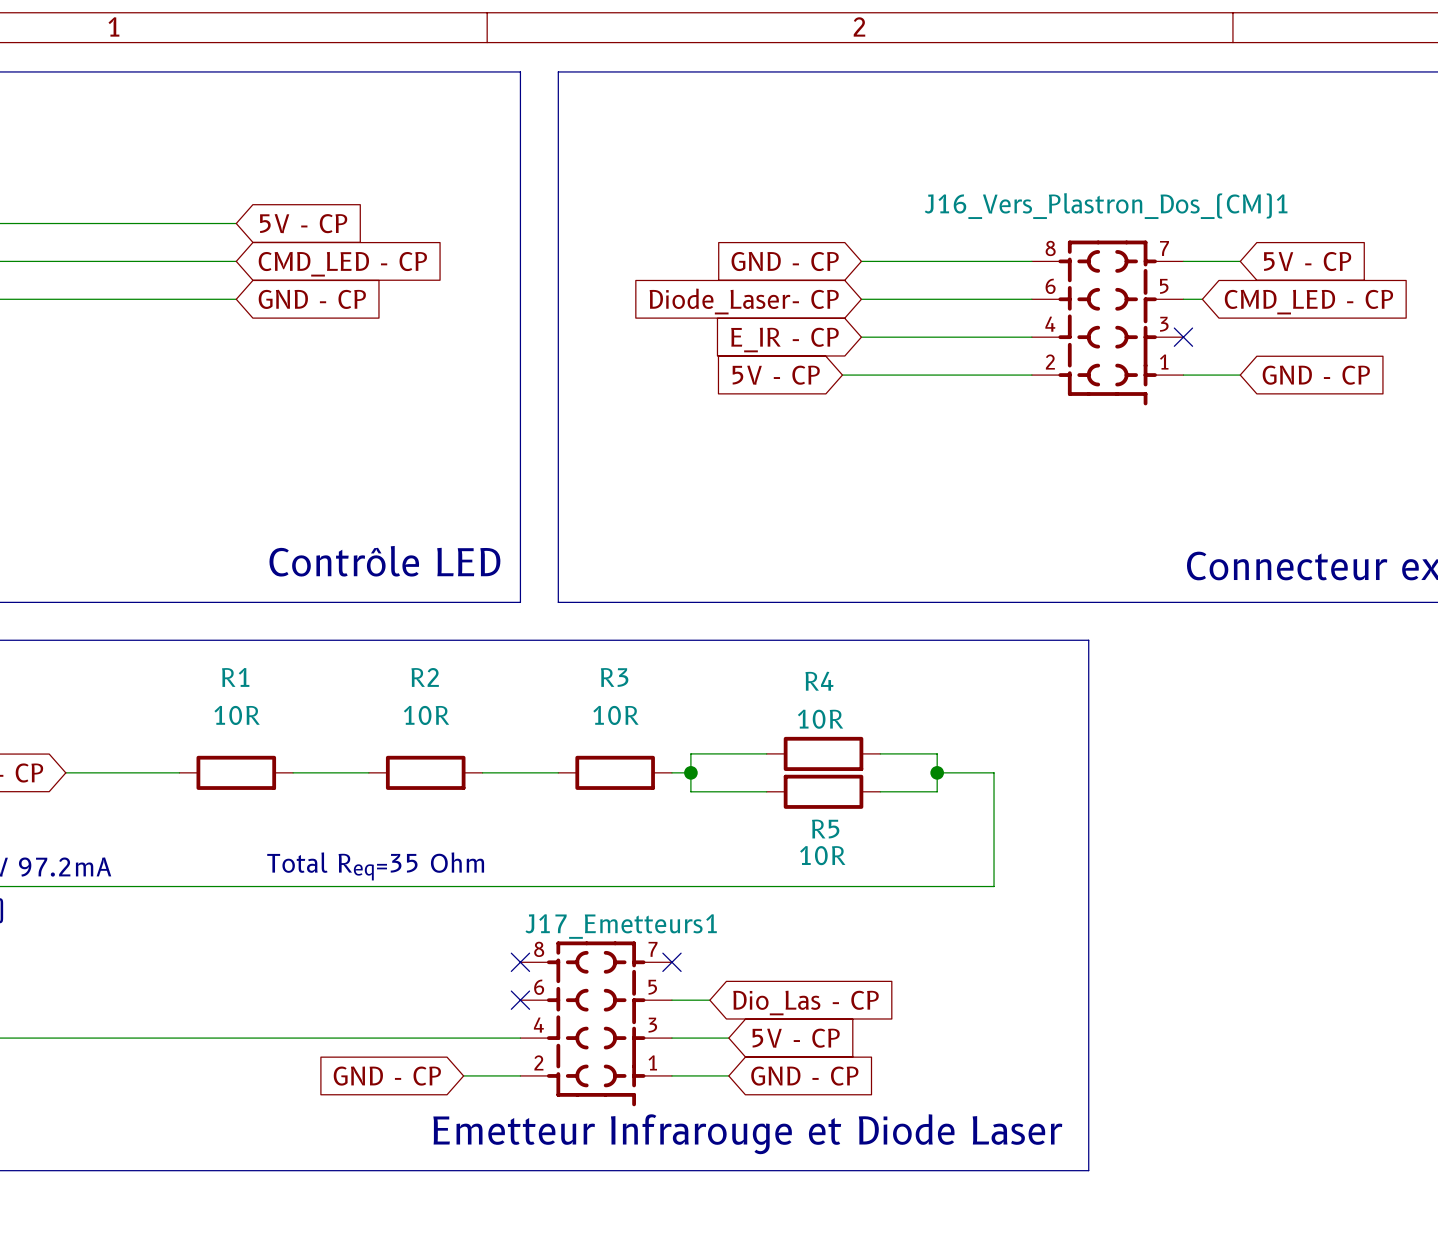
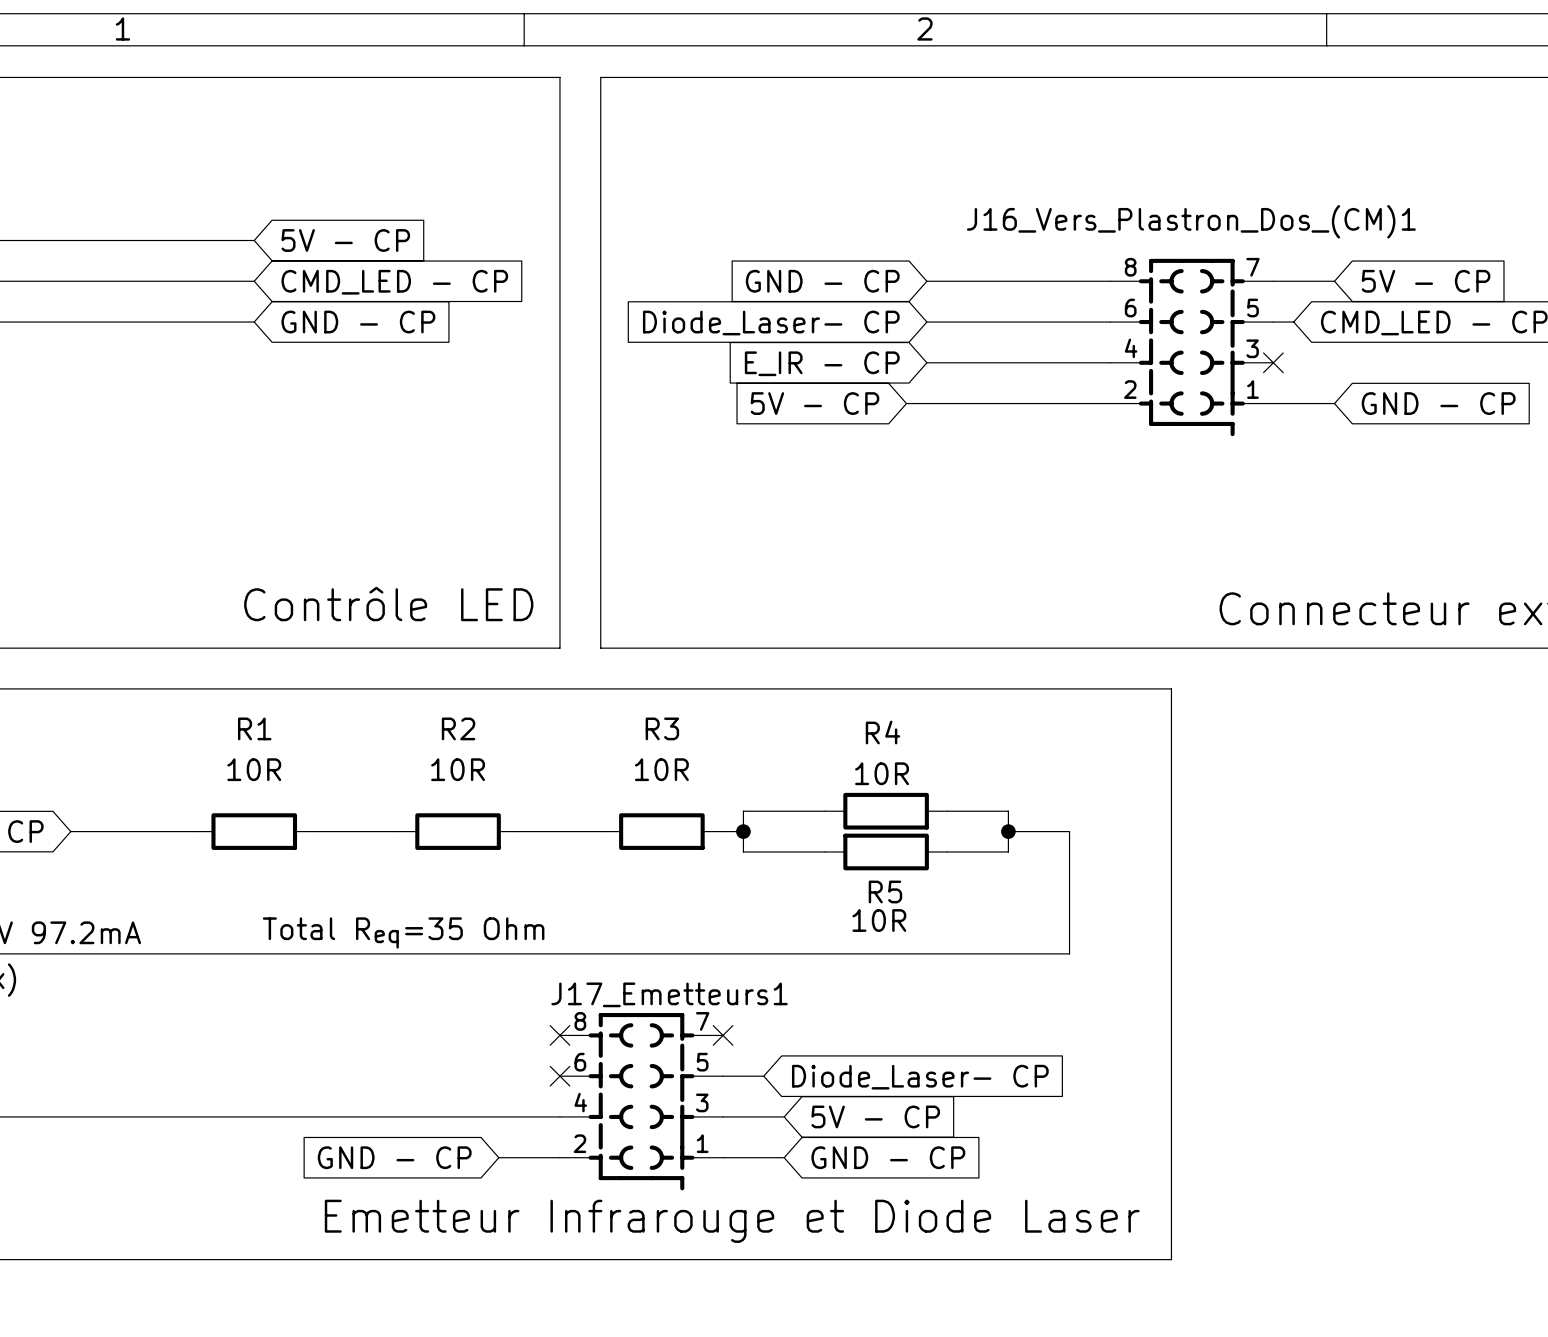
global label: Dio_Las - CP (806, 1003) -> Diode_Laser- CP (920, 1077)

